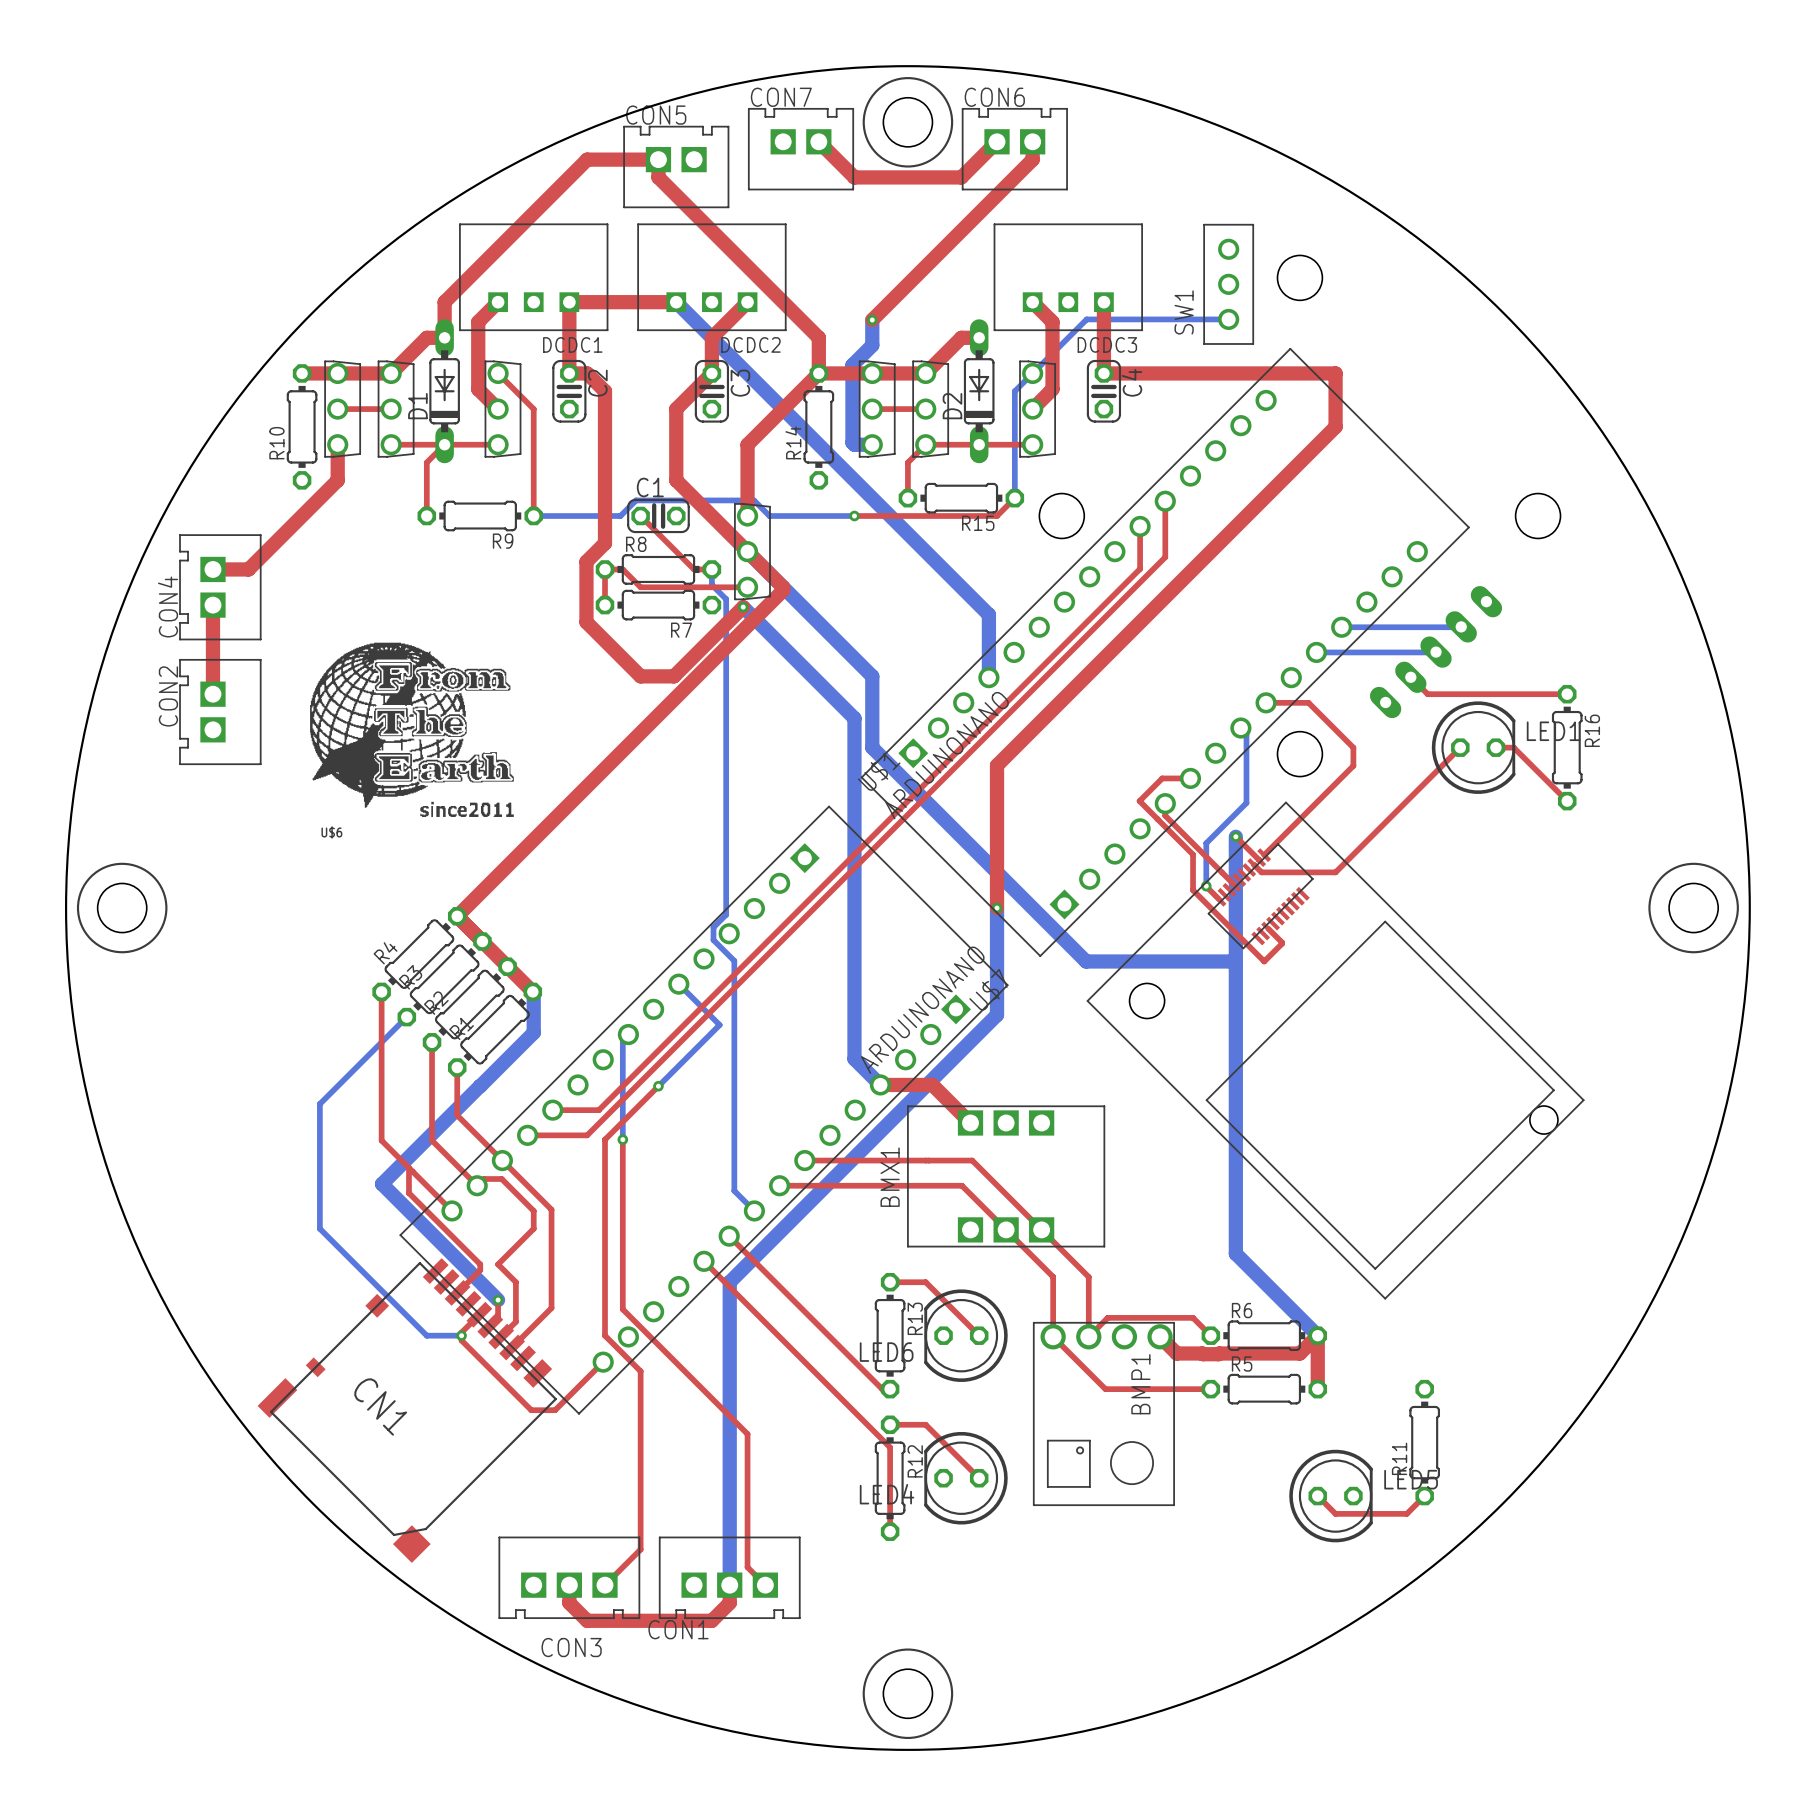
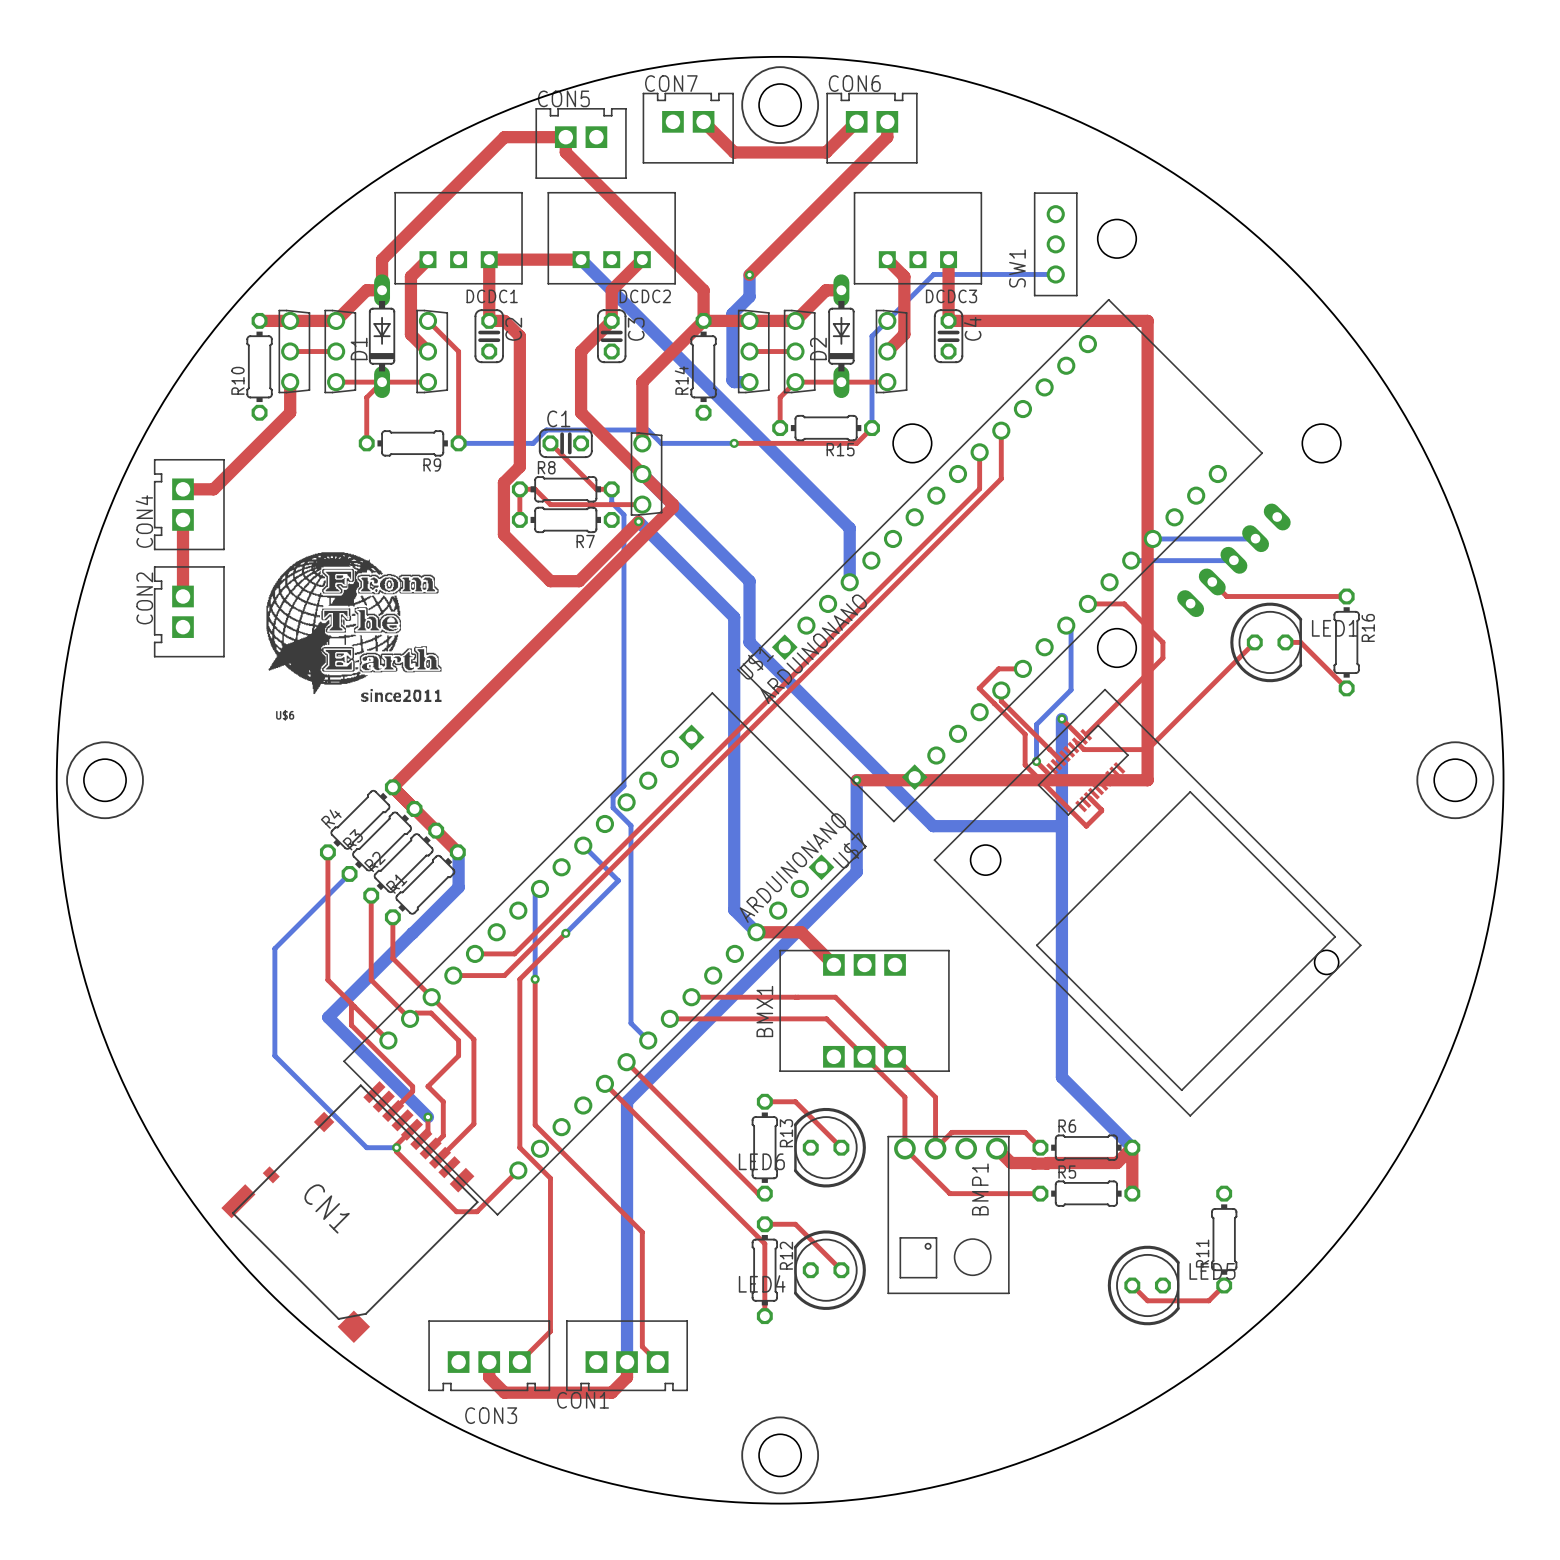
top track: (1335, 426) (997, 765) (997, 908) -> (1147, 366) (1147, 780) (856, 780)

